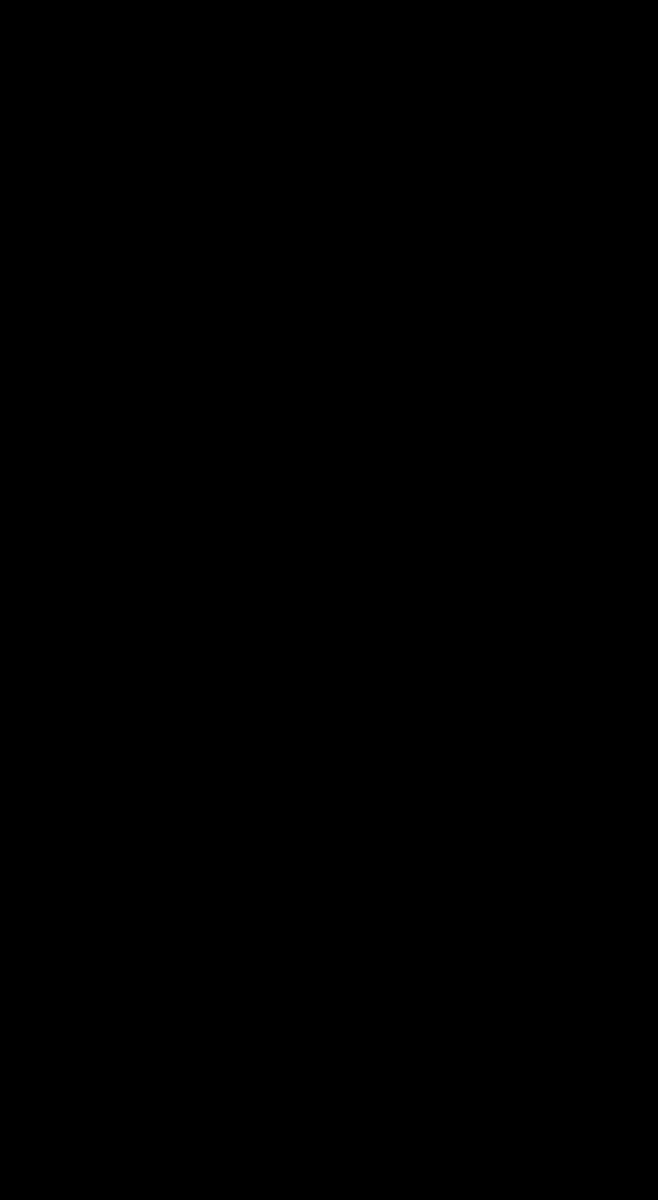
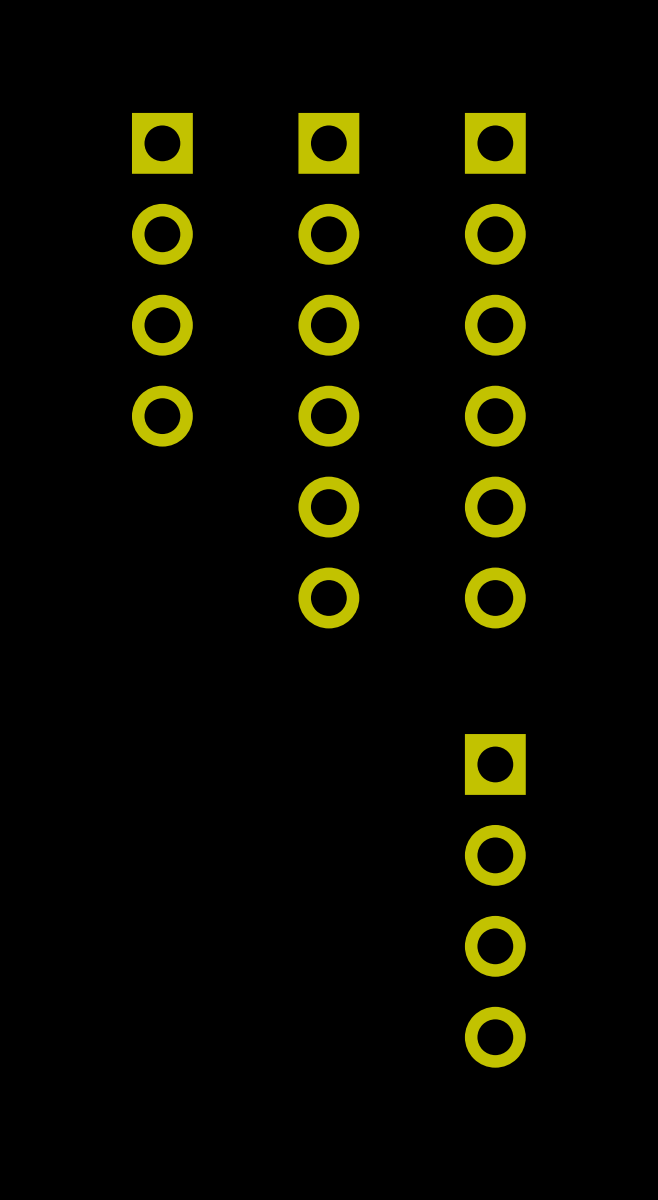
part: none -> (162, 279)
part: none -> (328, 370)
part: none -> (495, 370)
part: none -> (495, 900)

